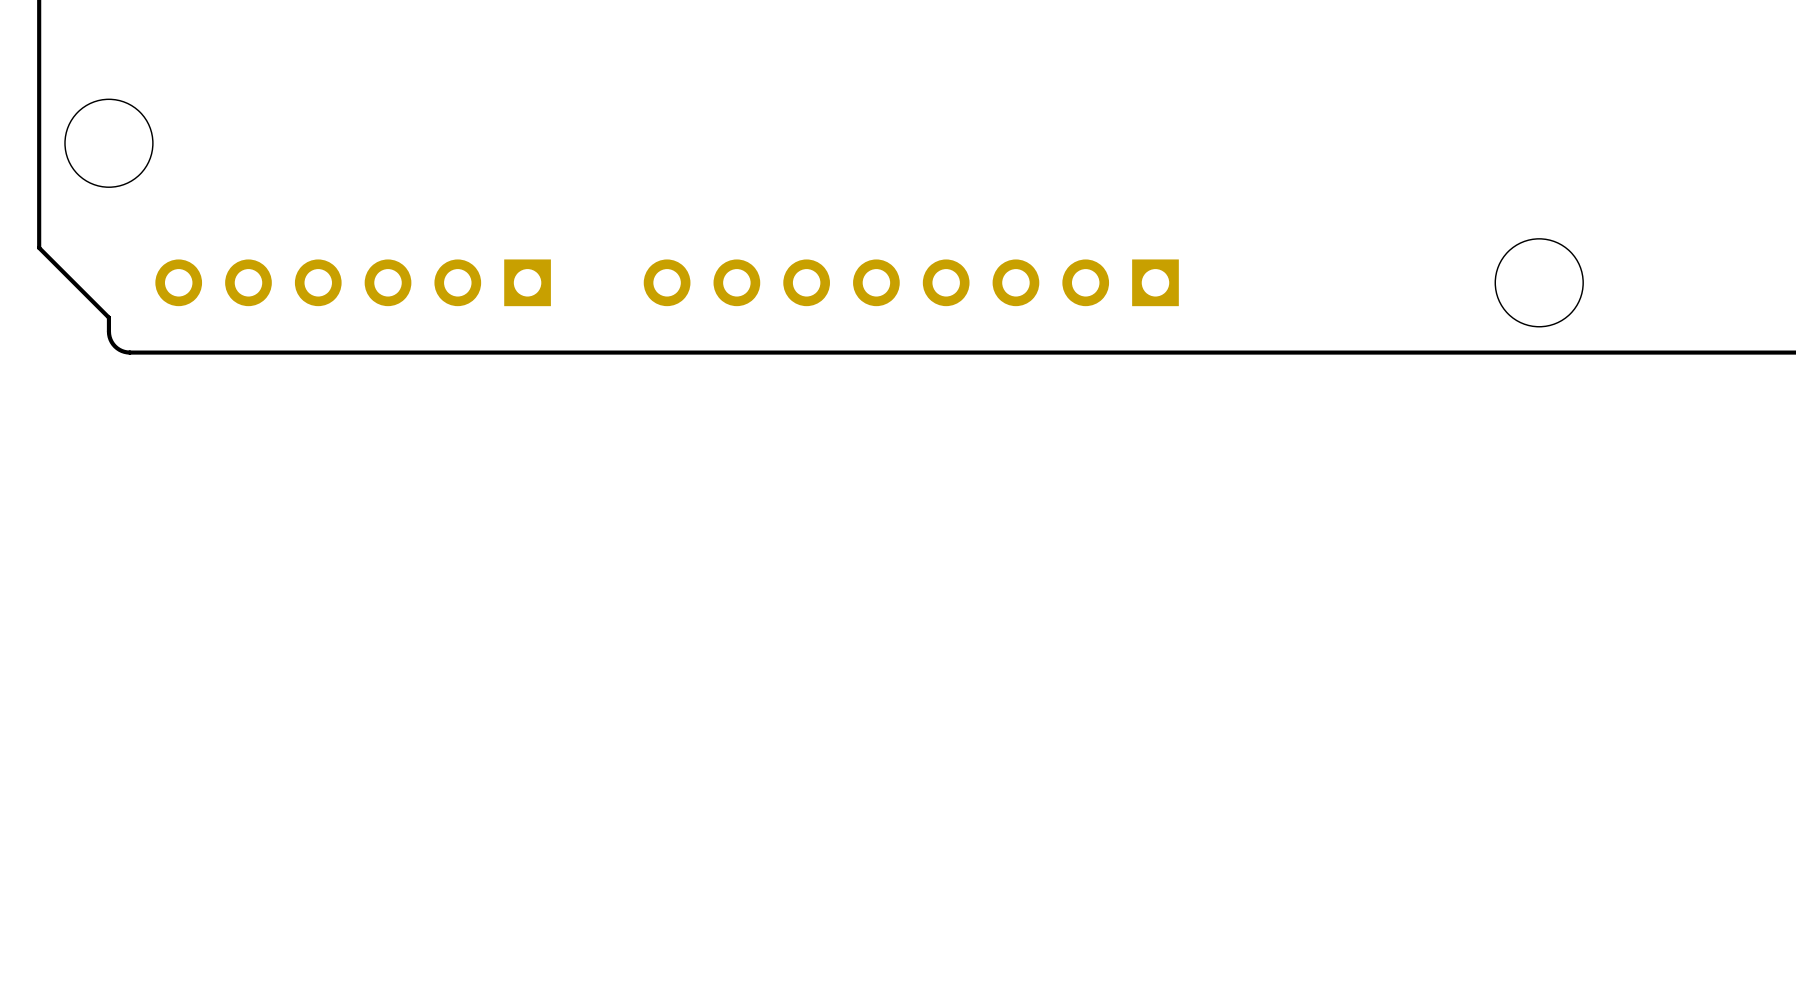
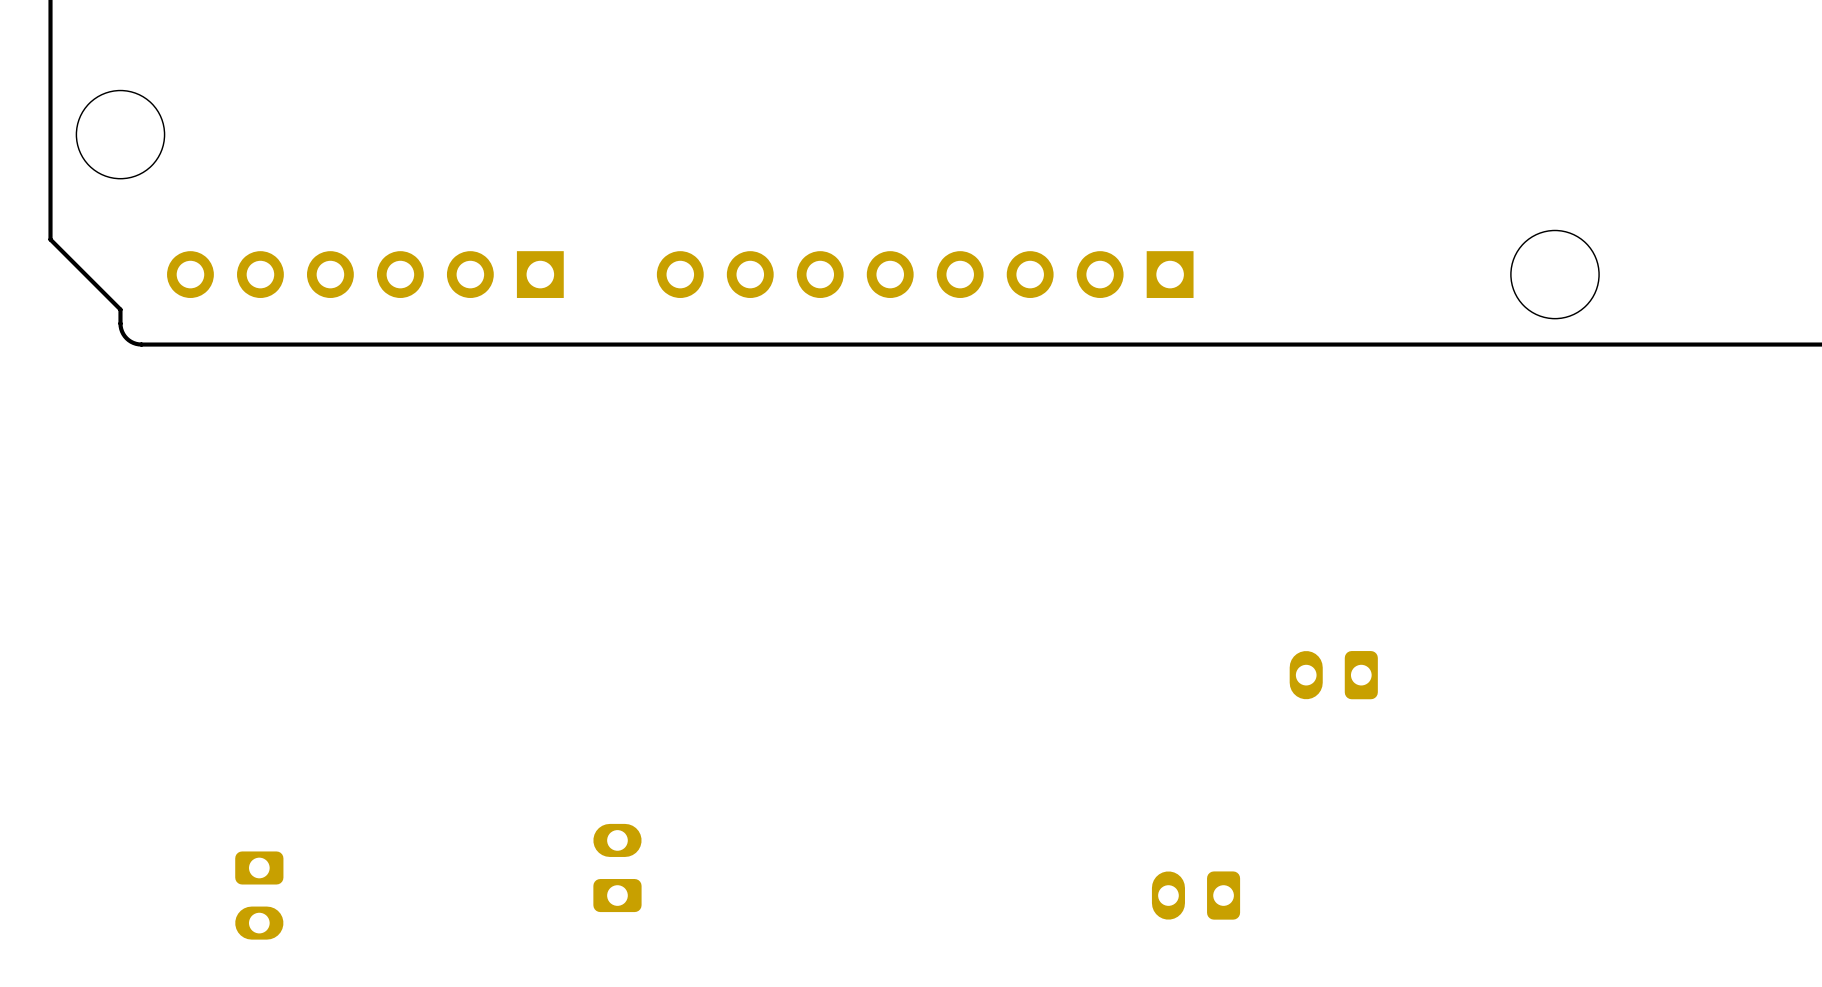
part: none -> (1333, 675)
part: none -> (617, 867)
part: none -> (259, 895)
part: none -> (1196, 895)

